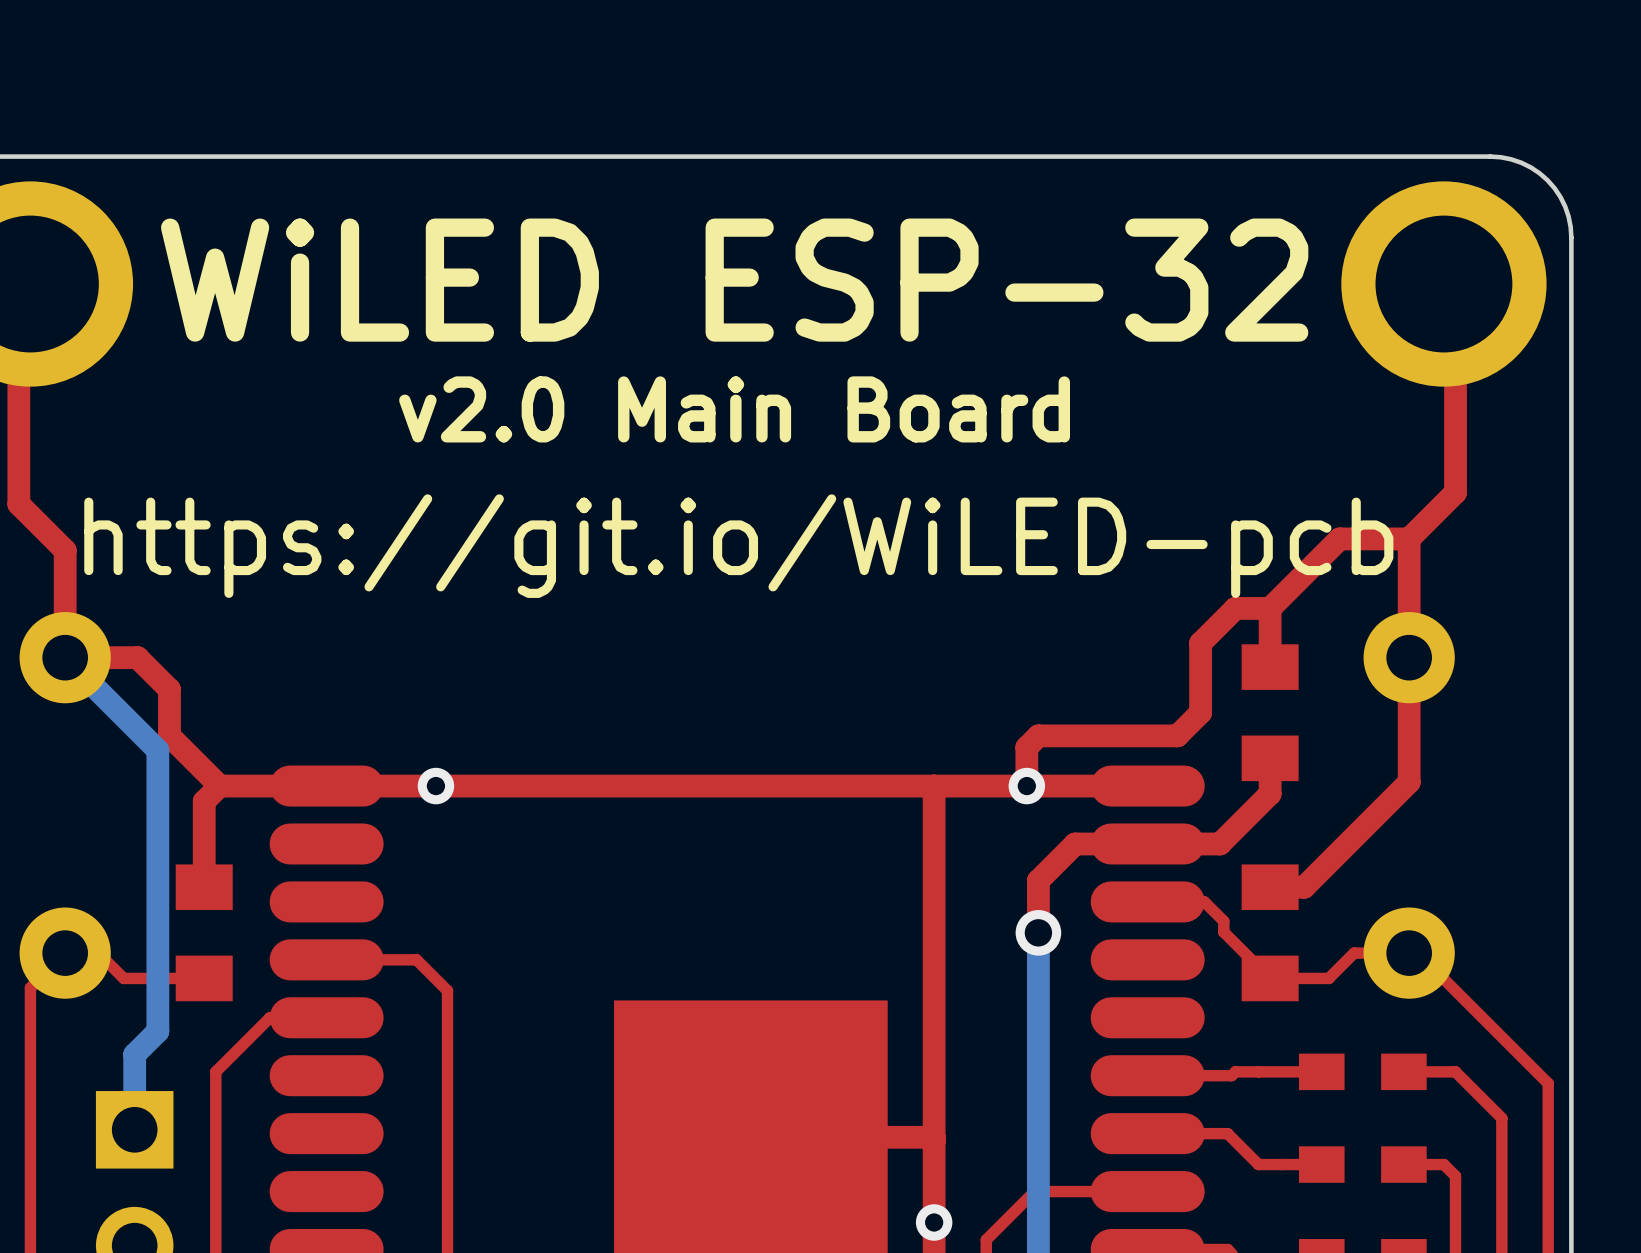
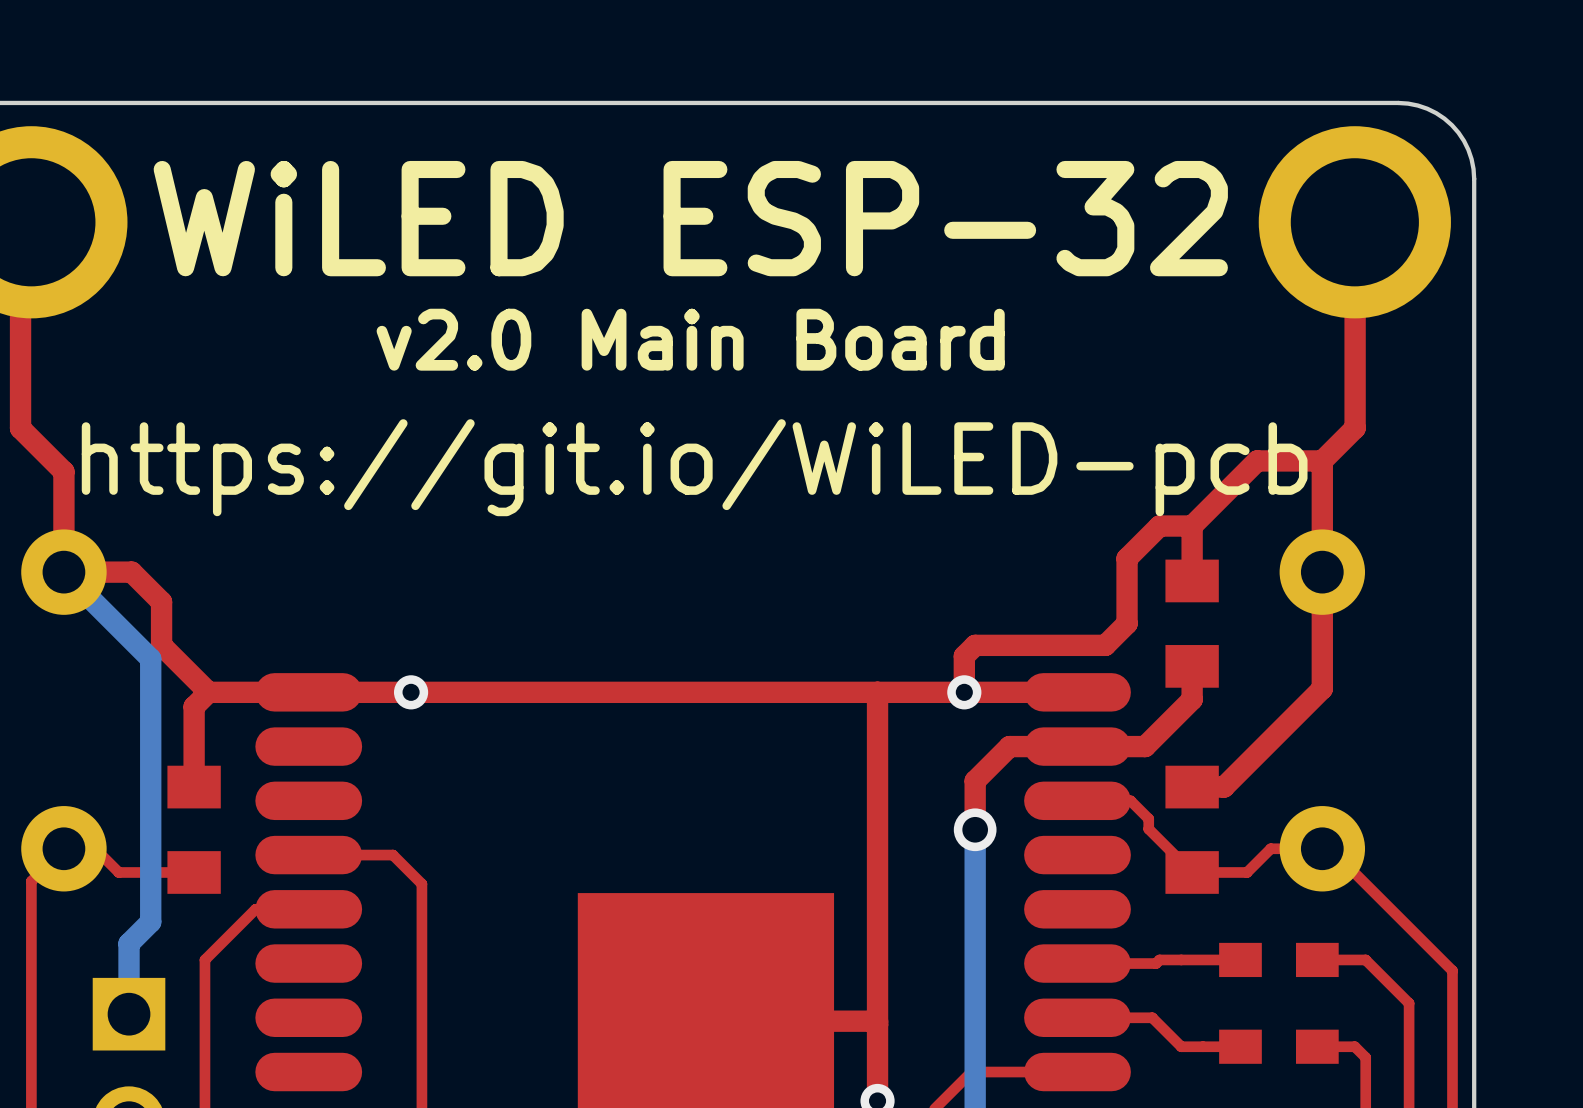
top track: (1455, 272) (1455, 492) (1444, 503) -> (1355, 201) (1355, 428)

